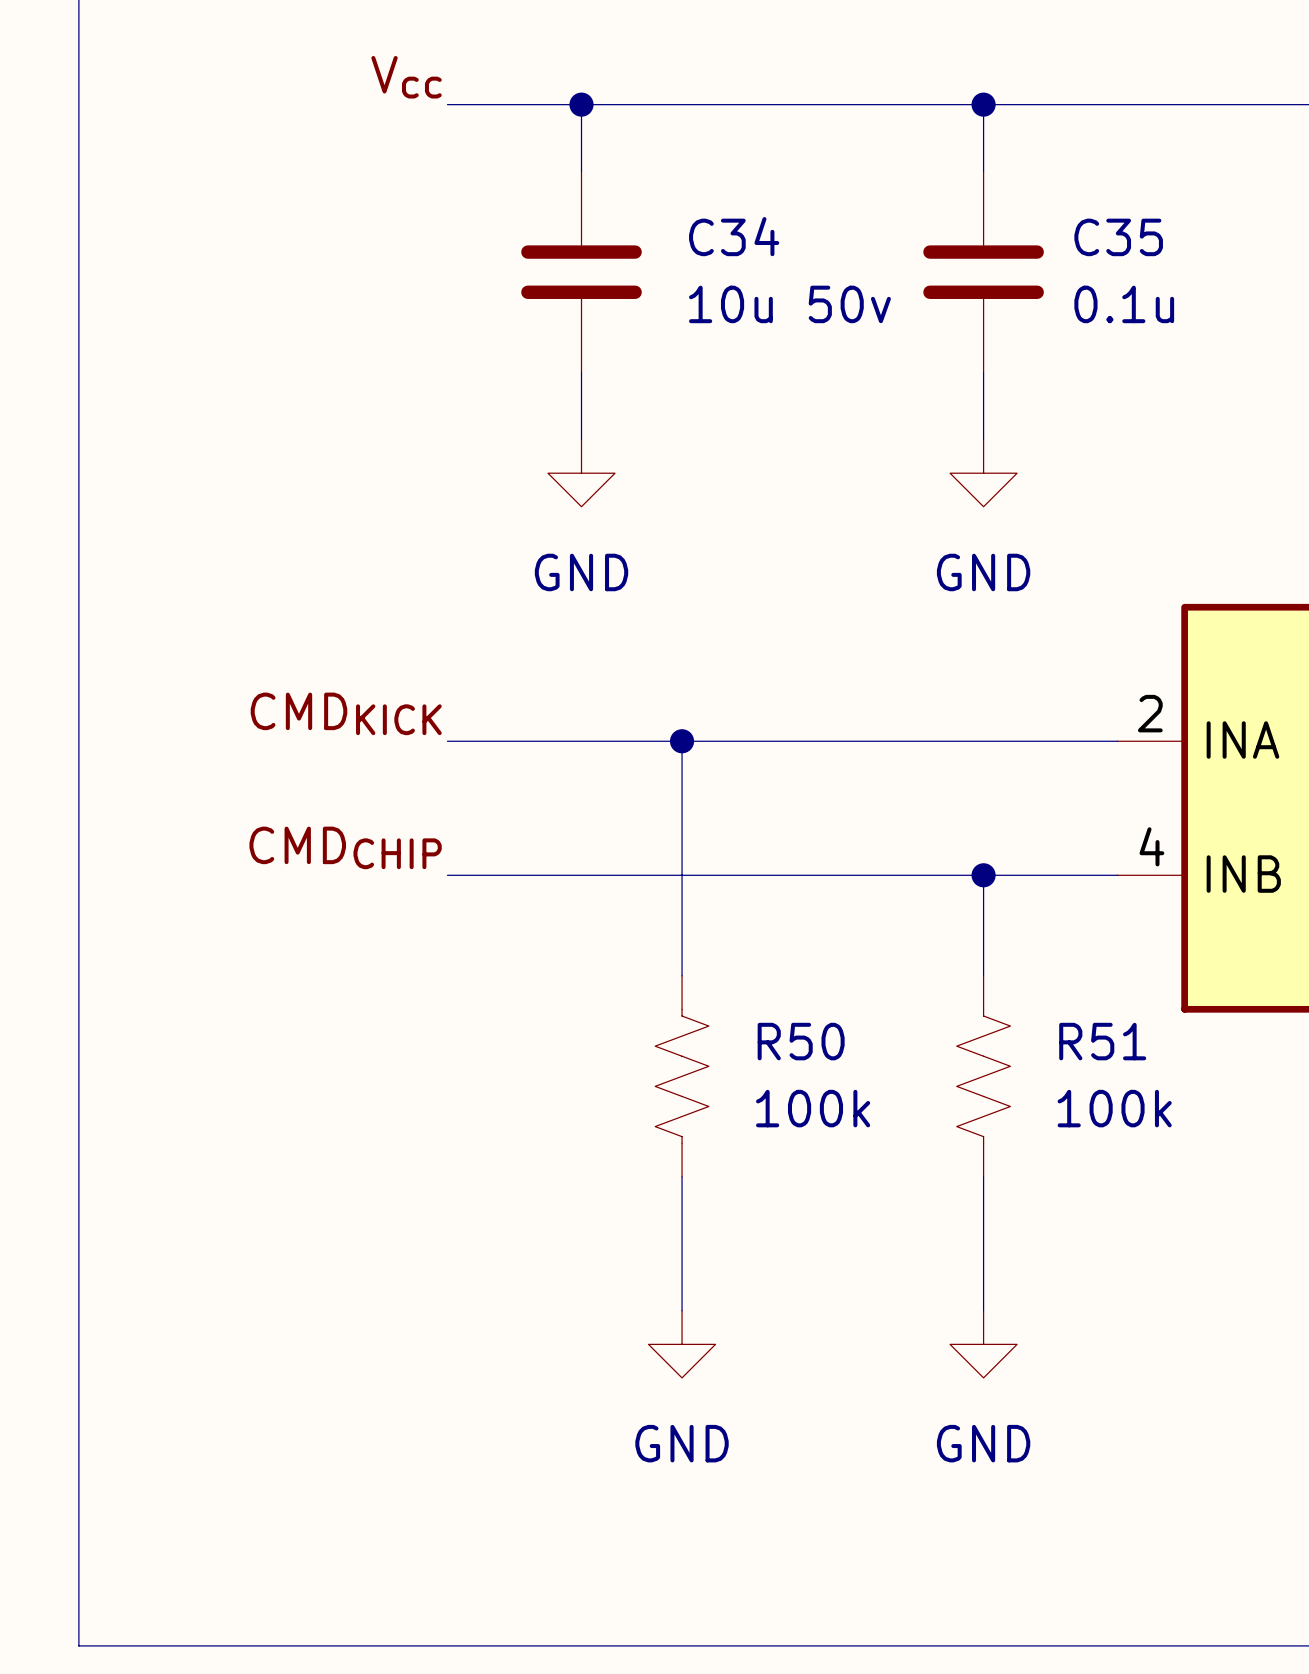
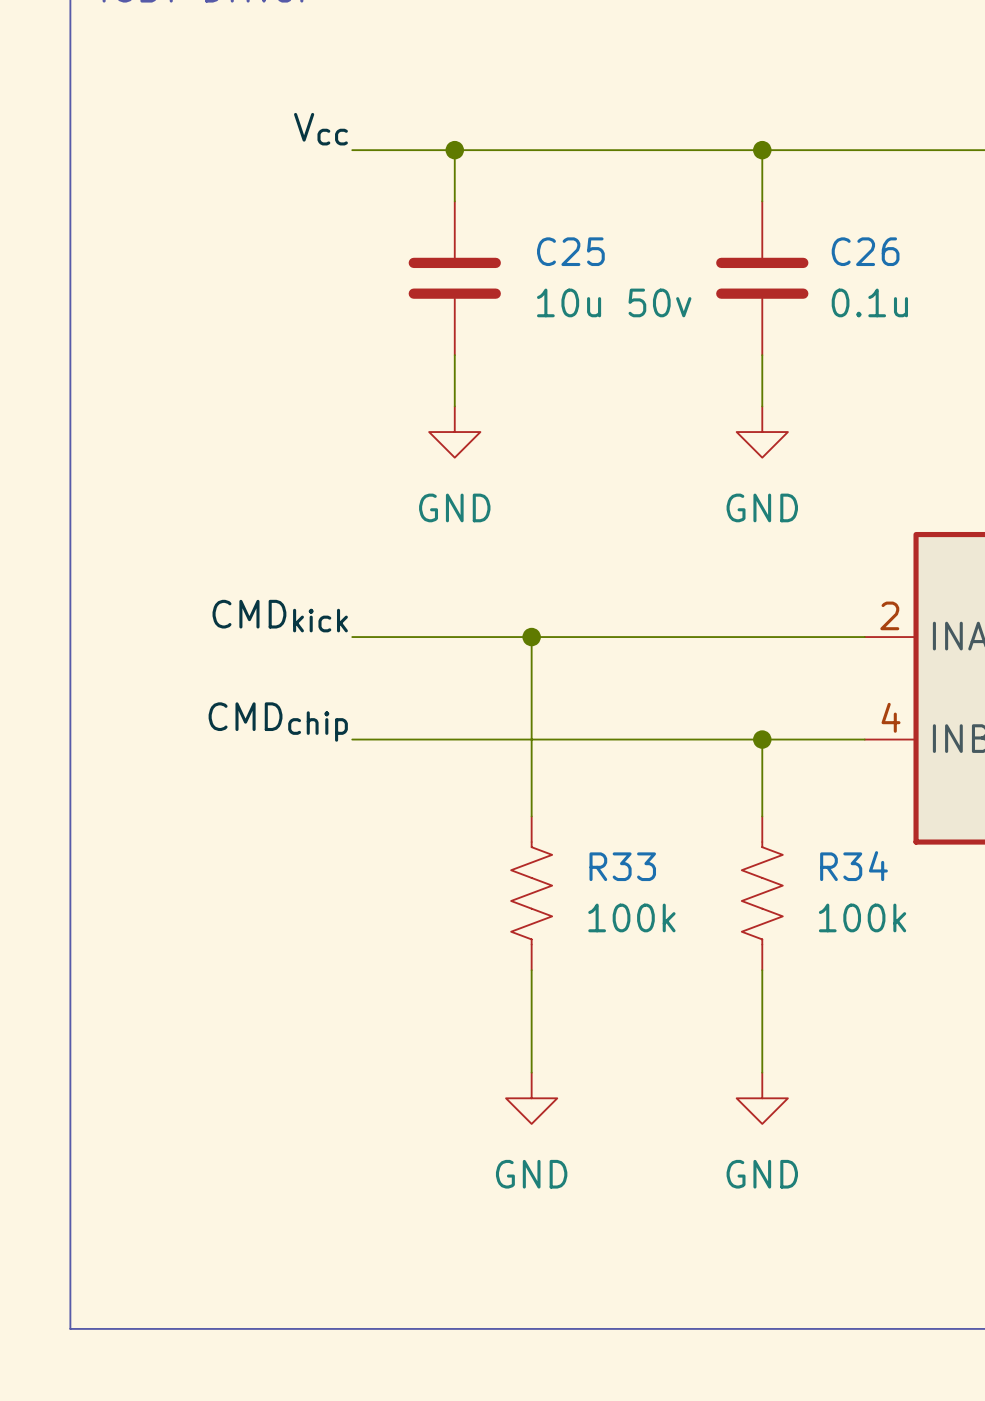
C34 name: C34 (734, 236) -> C25 (570, 251)
C35 name: C35 (1118, 237) -> C26 (865, 251)
label: CMDKICK (346, 713) -> CMDkick (280, 616)
label: CMDCHIP (345, 847) -> CMDchip (278, 722)
R50 name: R50 (801, 1041) -> R33 (622, 866)
R51 name: R51 (1102, 1041) -> R34 (853, 866)

